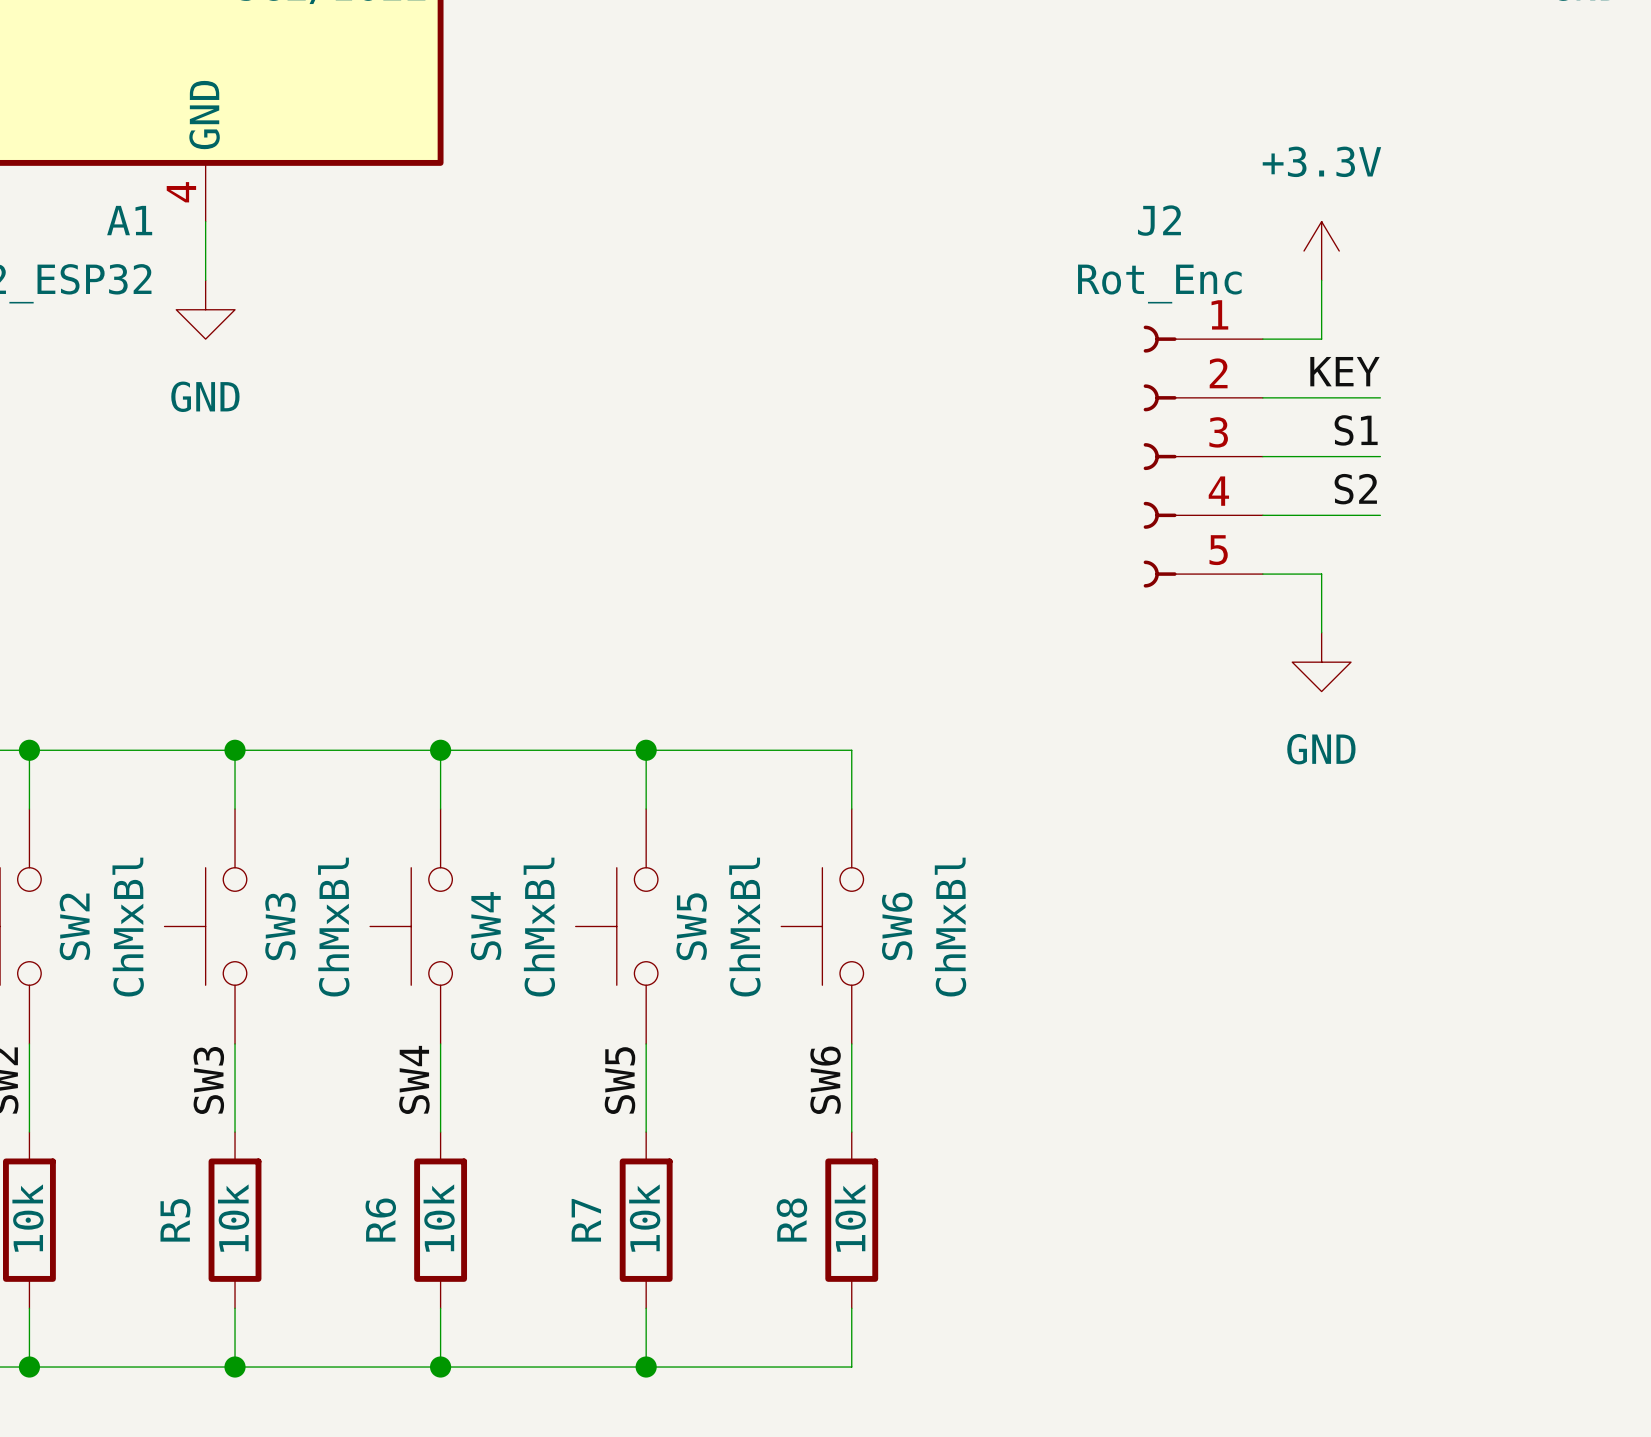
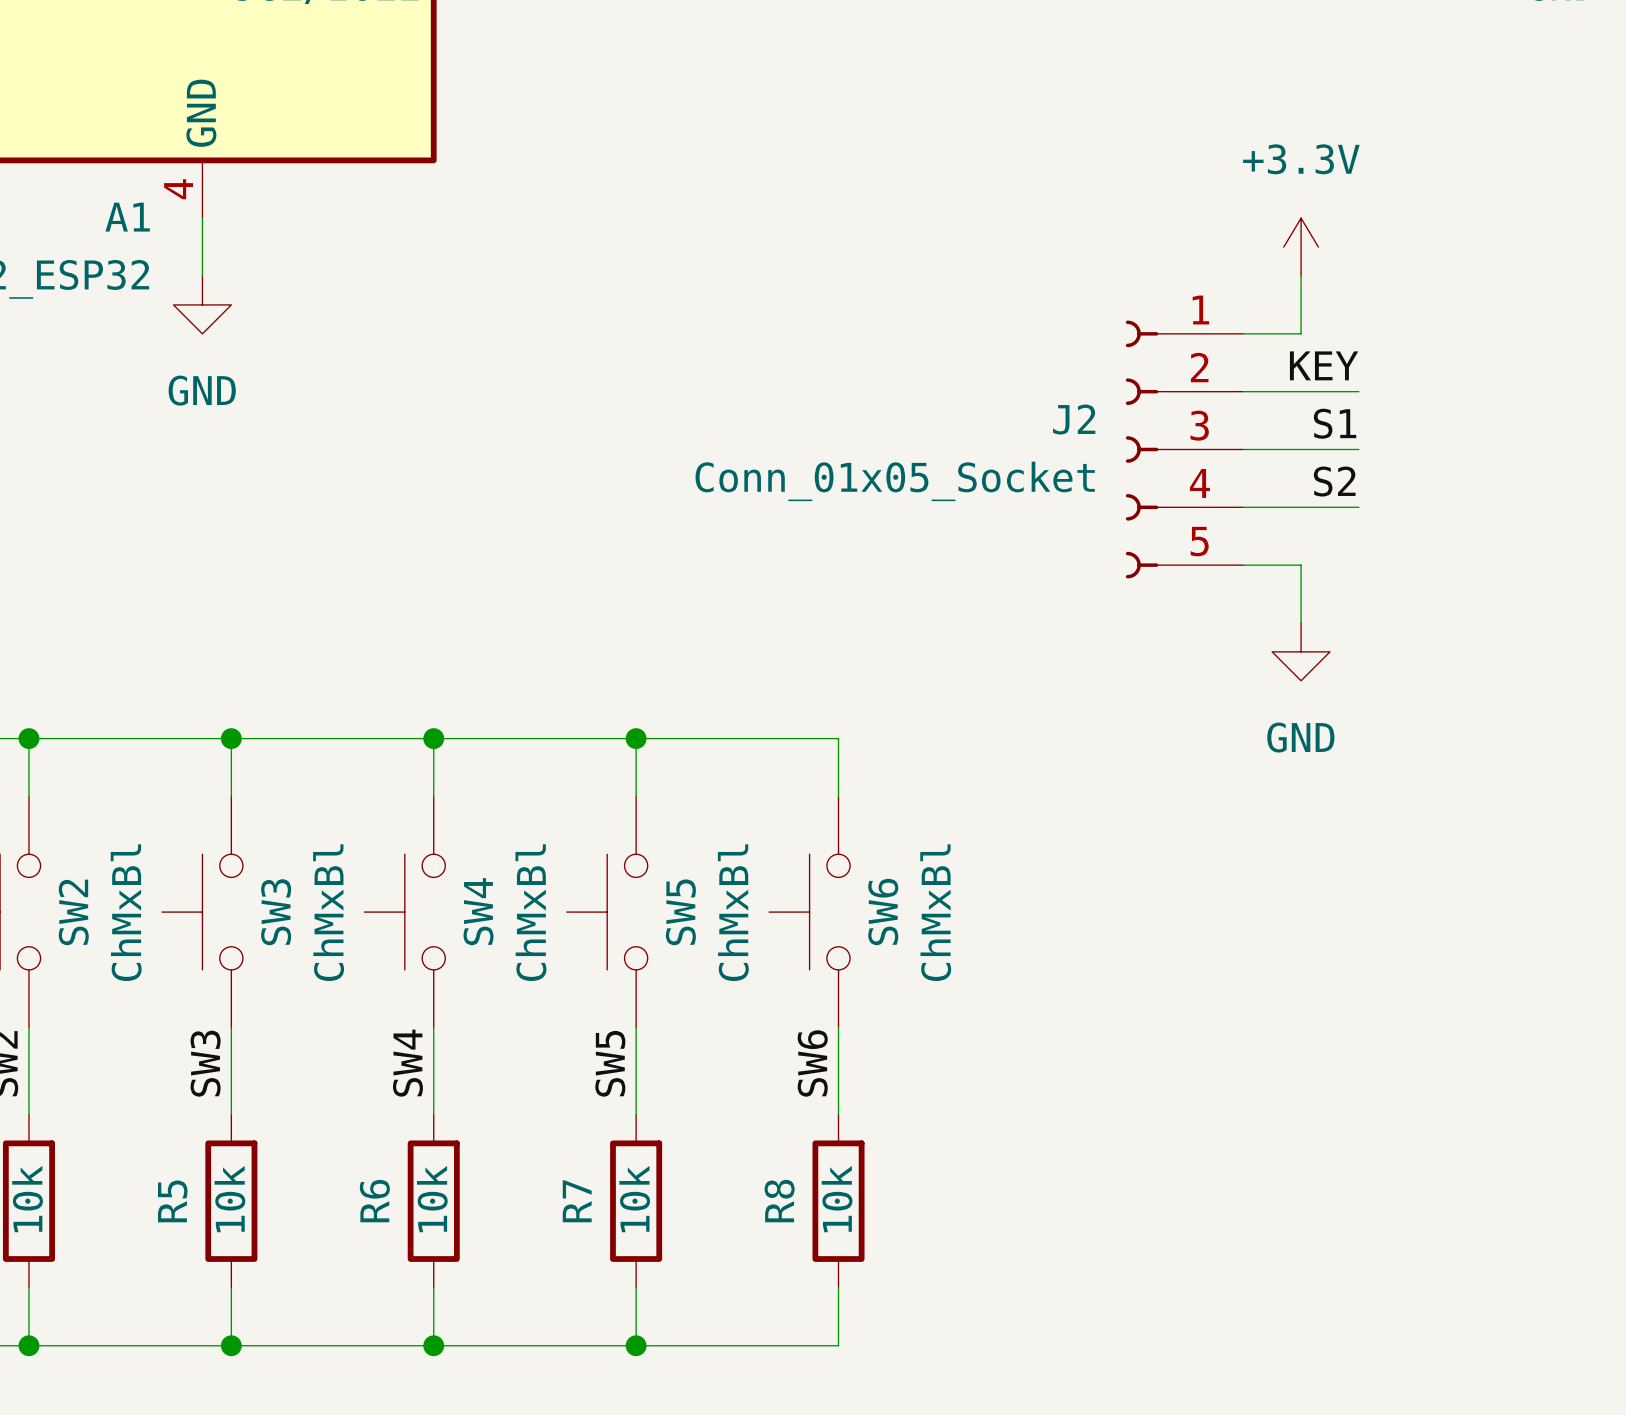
J2 name position: J2 (1159, 220) -> J2 (1074, 419)
J2 value: Rot_Enc (1159, 284) -> Conn_01x05_Socket (895, 481)

